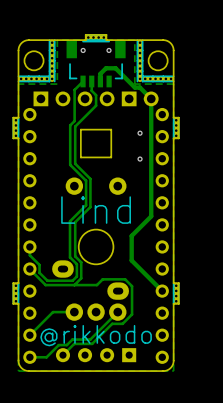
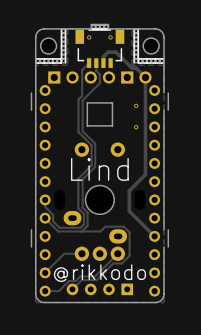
part: (15, 128) -> none
part: (176, 128) -> none
part: (15, 293) -> none
part: (176, 293) -> none

